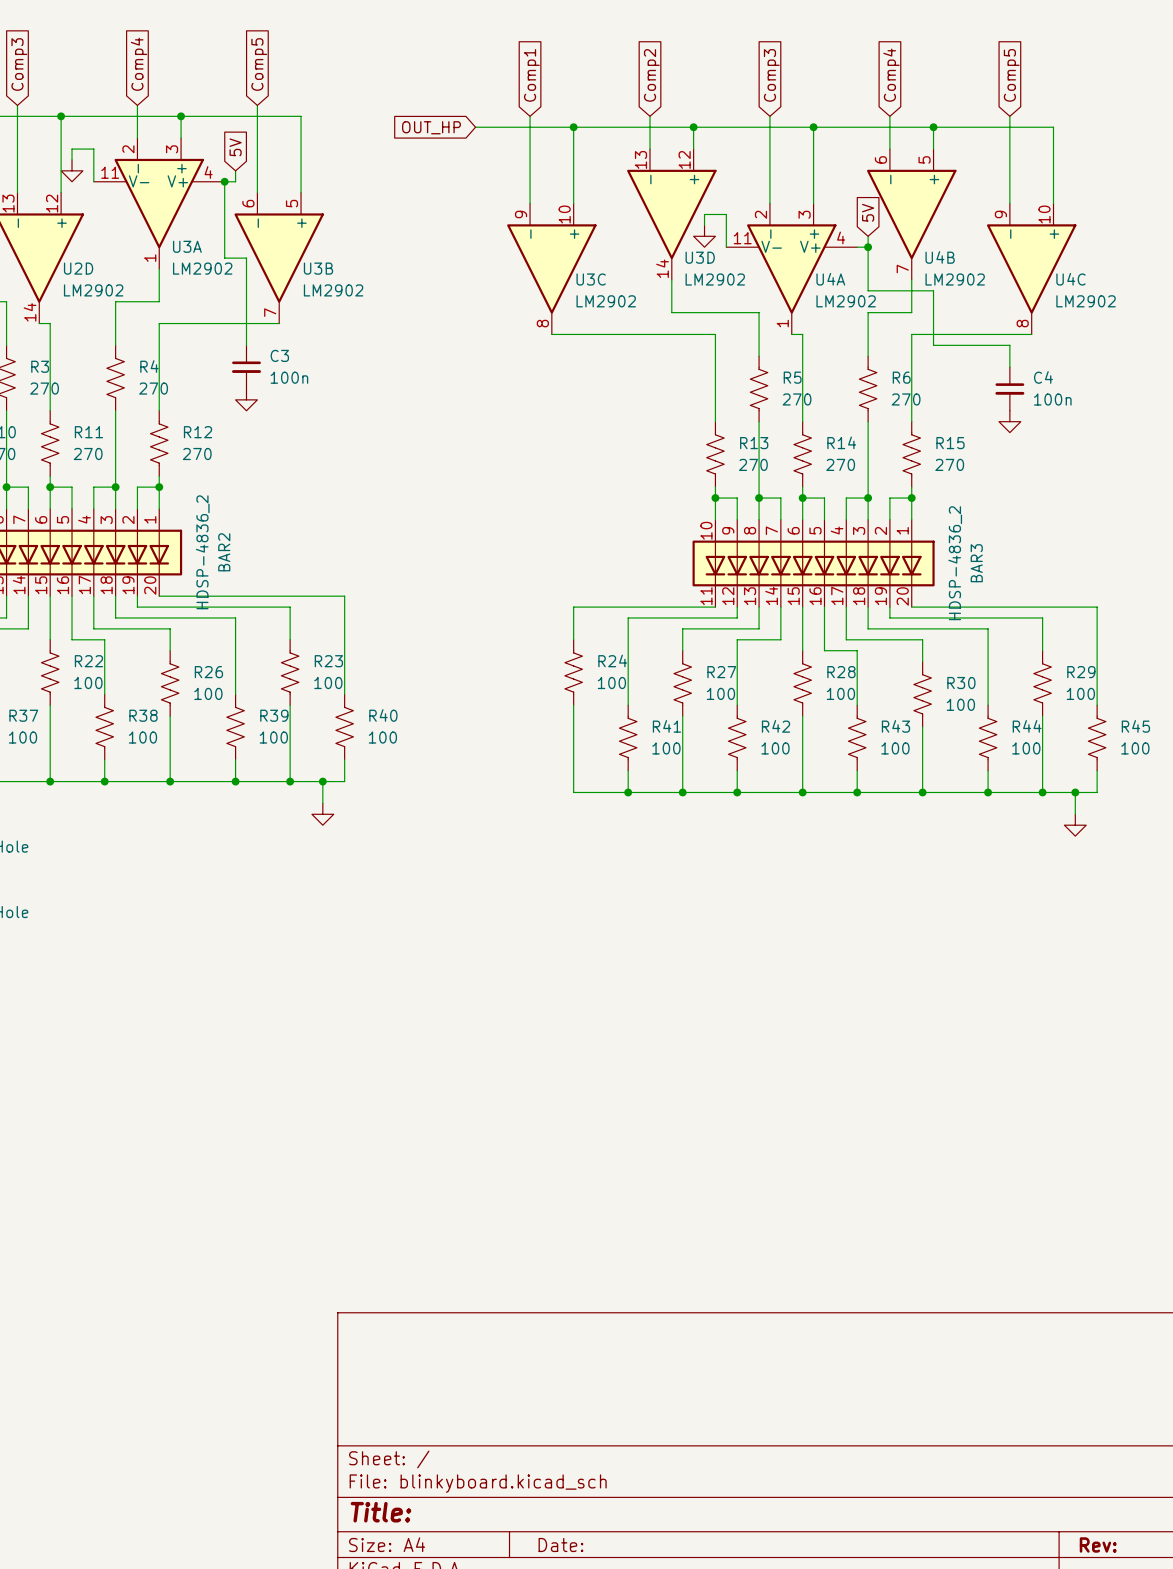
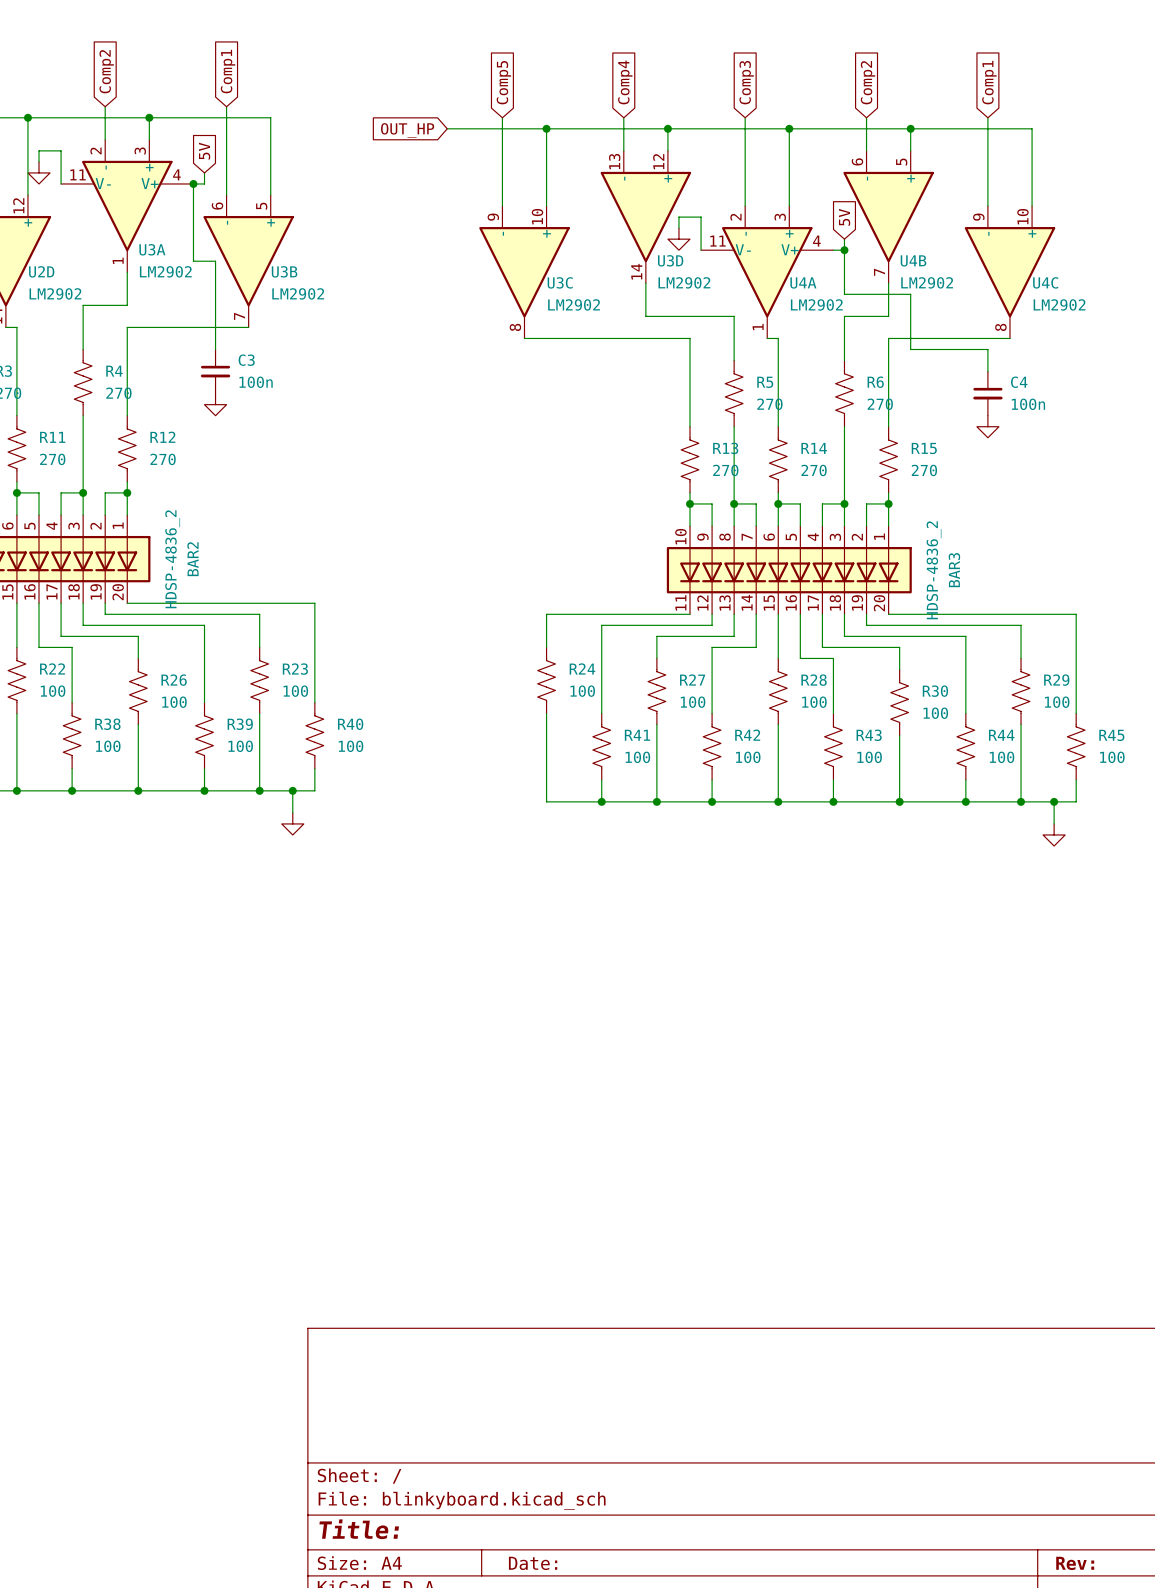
global label: Comp4 (138, 64) -> Comp2 (106, 71)
global label: Comp5 (259, 64) -> Comp1 (228, 71)
global label: Comp1 (531, 75) -> Comp5 (503, 82)
global label: Comp2 (651, 75) -> Comp4 (625, 82)
global label: Comp4 (891, 75) -> Comp2 (868, 82)
global label: Comp5 (1011, 75) -> Comp1 (989, 82)

